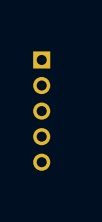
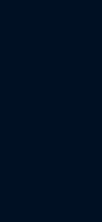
part: (41, 111) -> none

